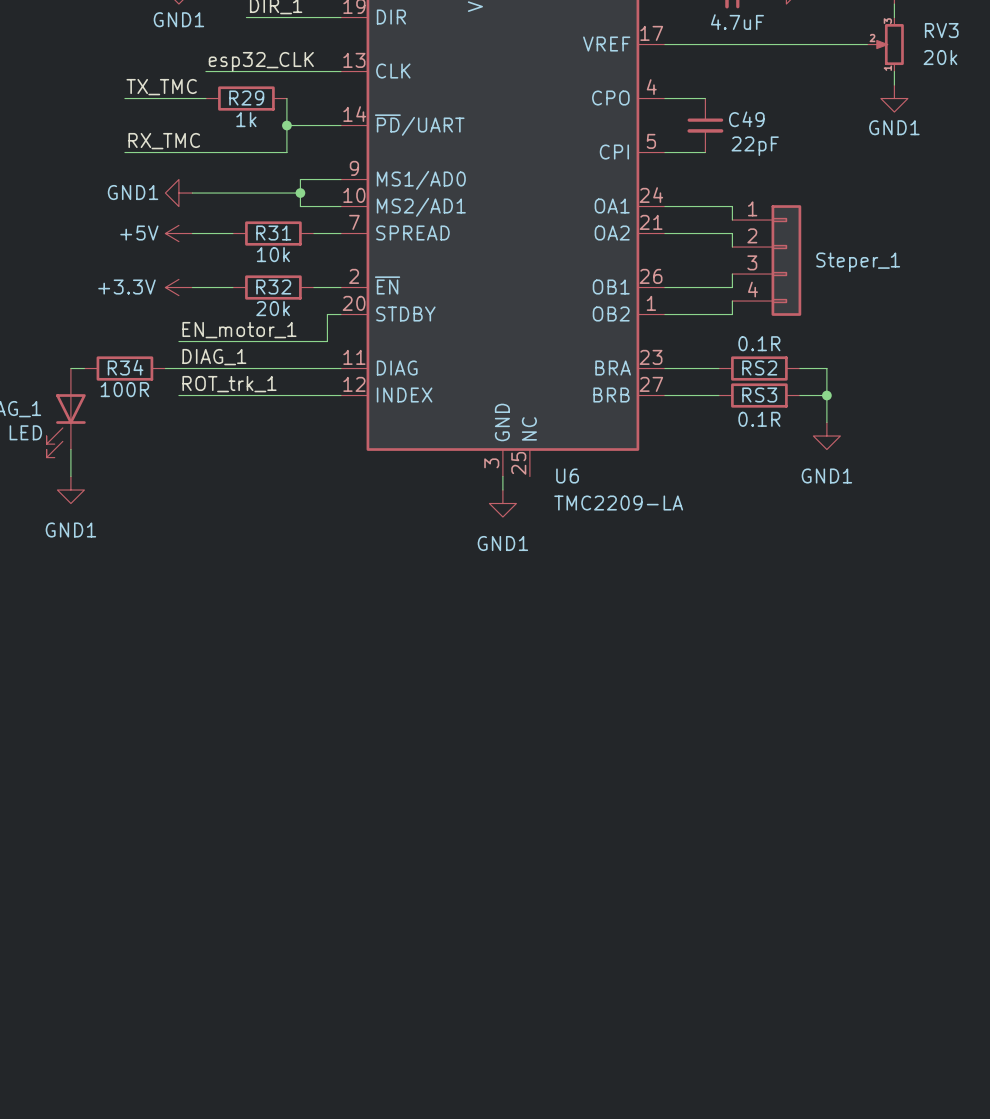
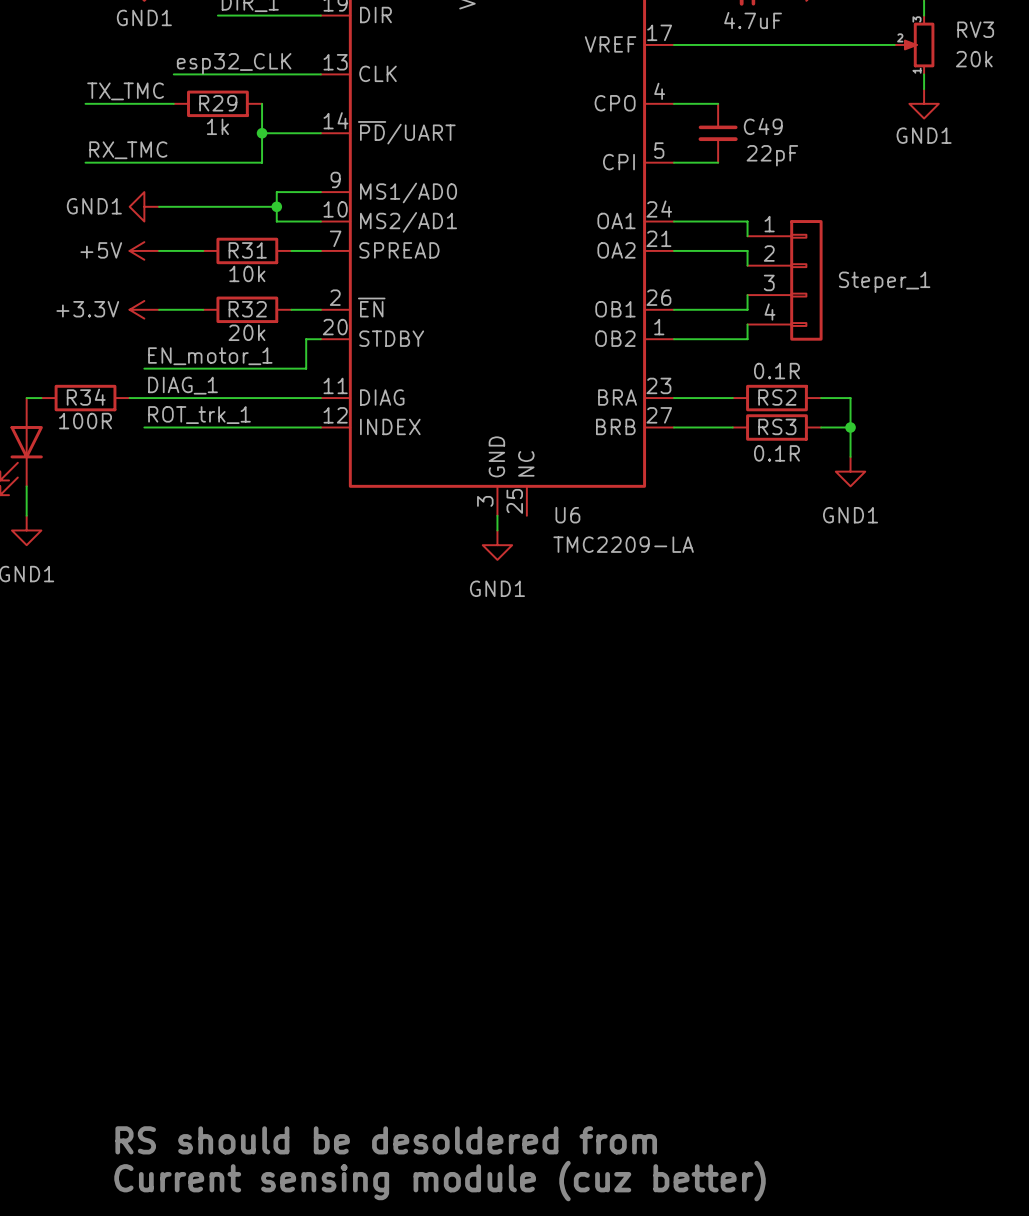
text: none -> RS should be desoldered from (386, 1140)
text: none -> Current sensing module (cuz better) (440, 1181)

